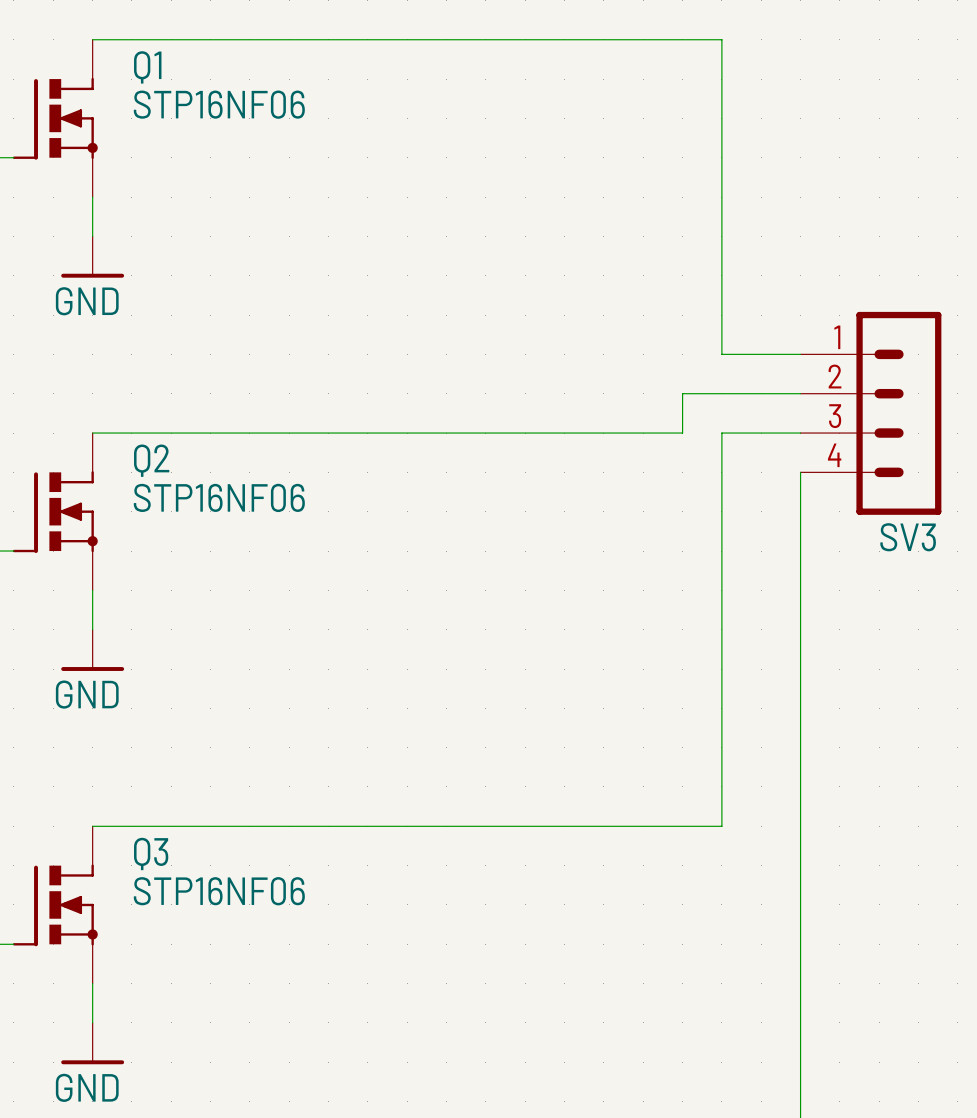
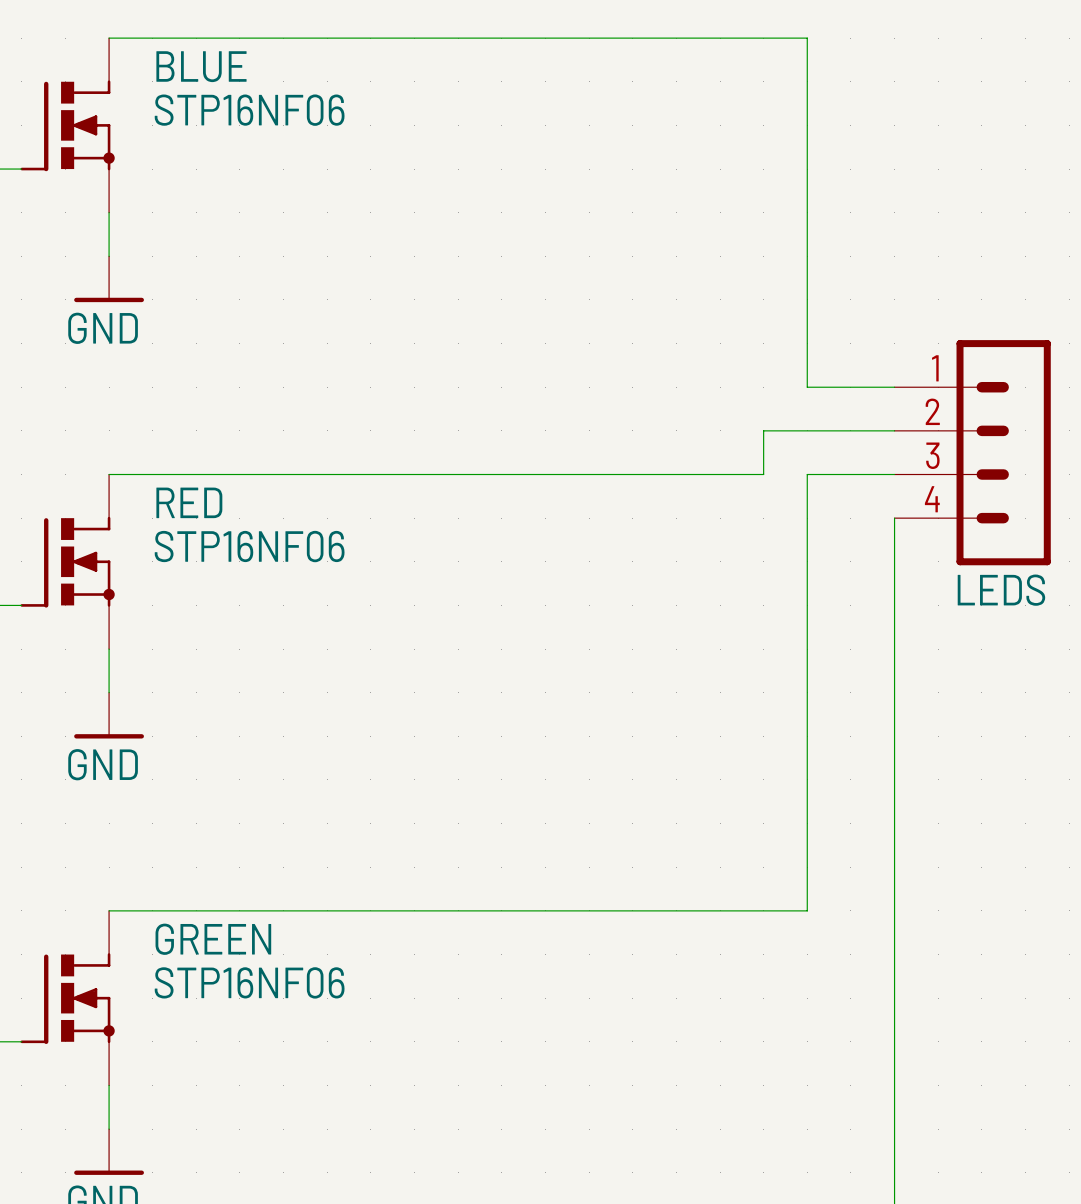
Q1 name: Q1 (147, 67) -> BLUE (201, 66)
Q2 name: Q2 (151, 460) -> RED (189, 502)
SV3 name: SV3 (908, 537) -> LEDS (1001, 590)
Q3 name: Q3 (151, 853) -> GREEN (213, 939)

